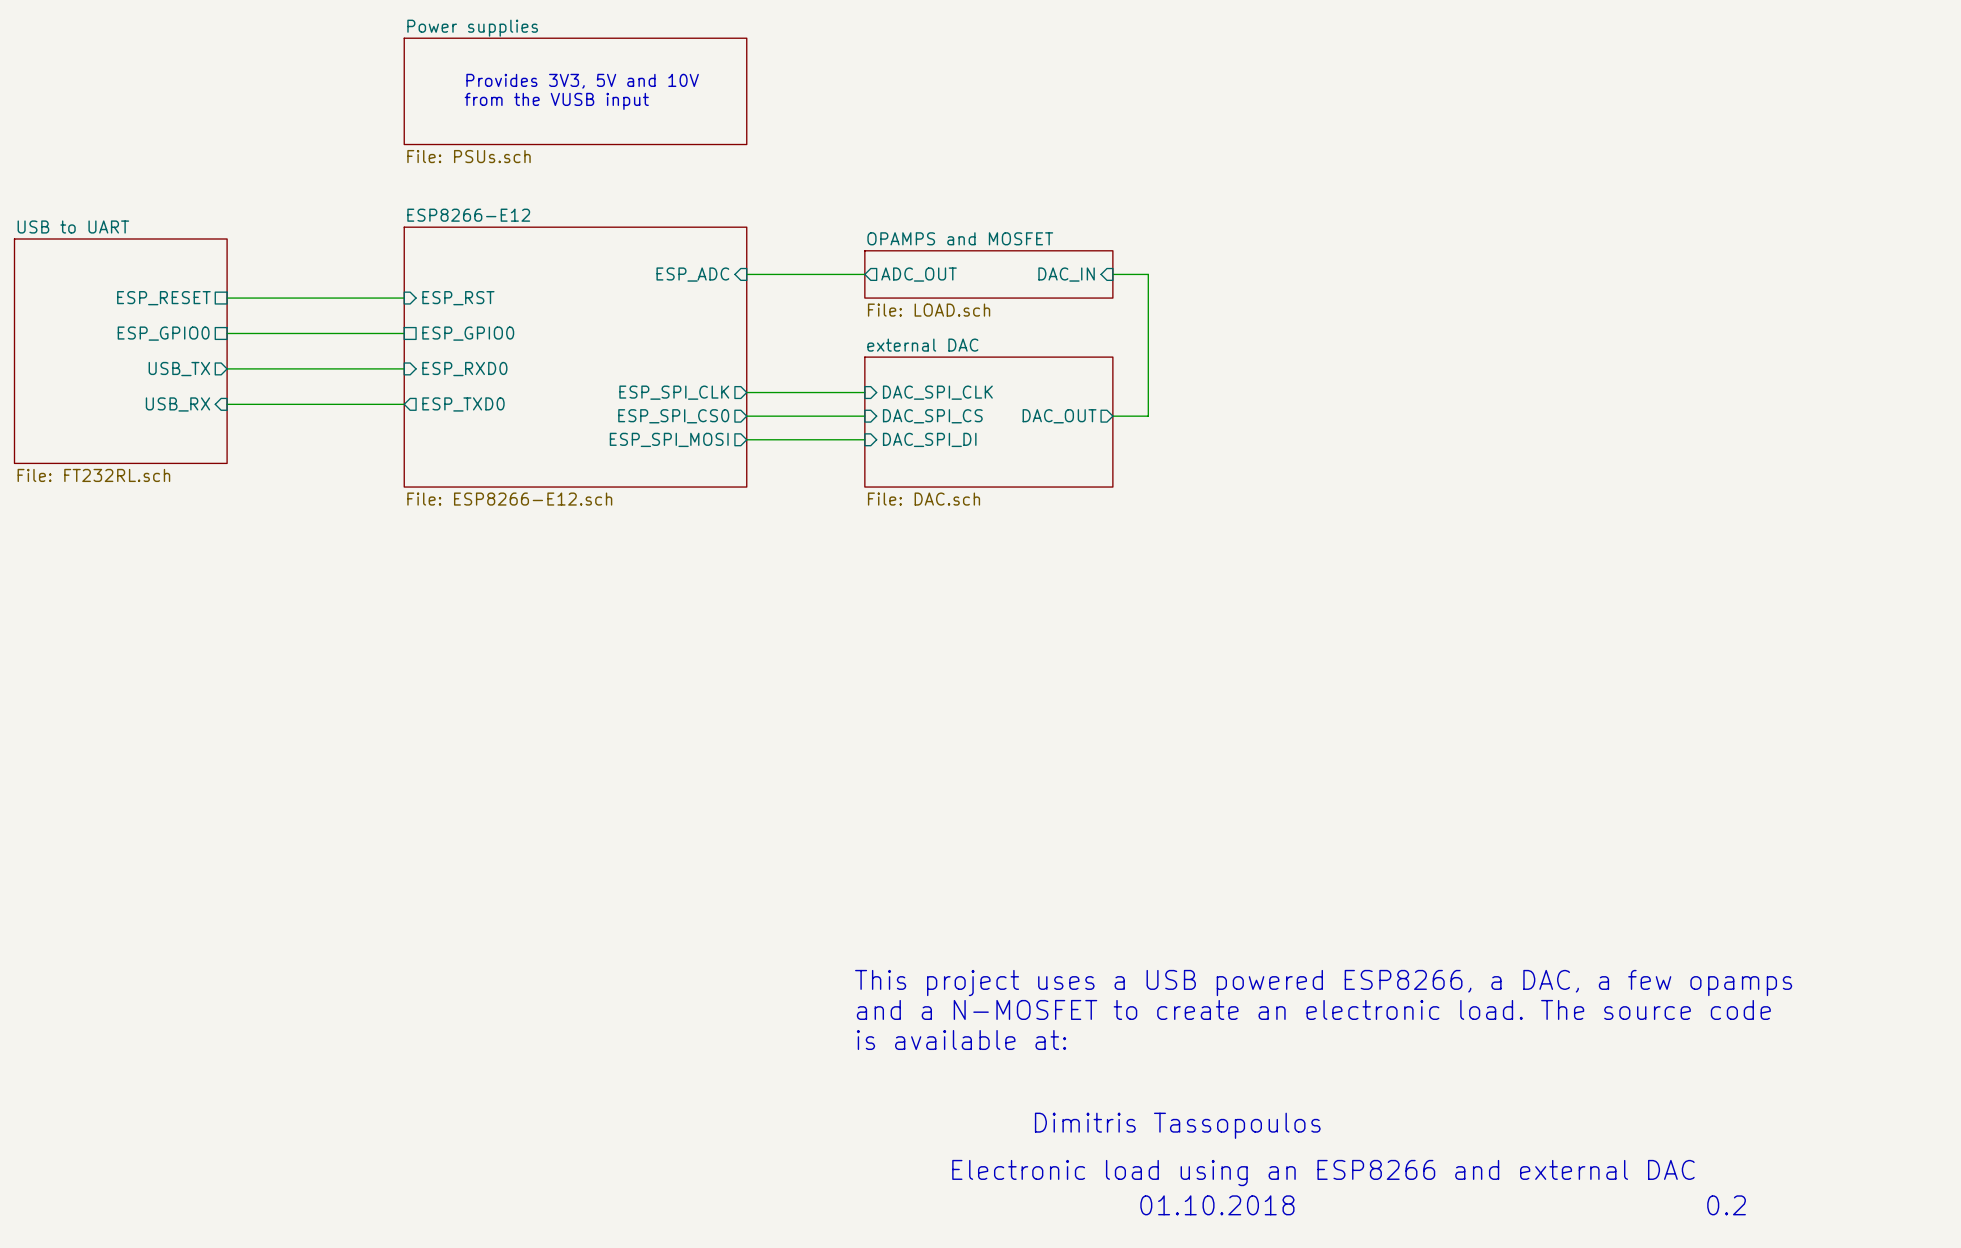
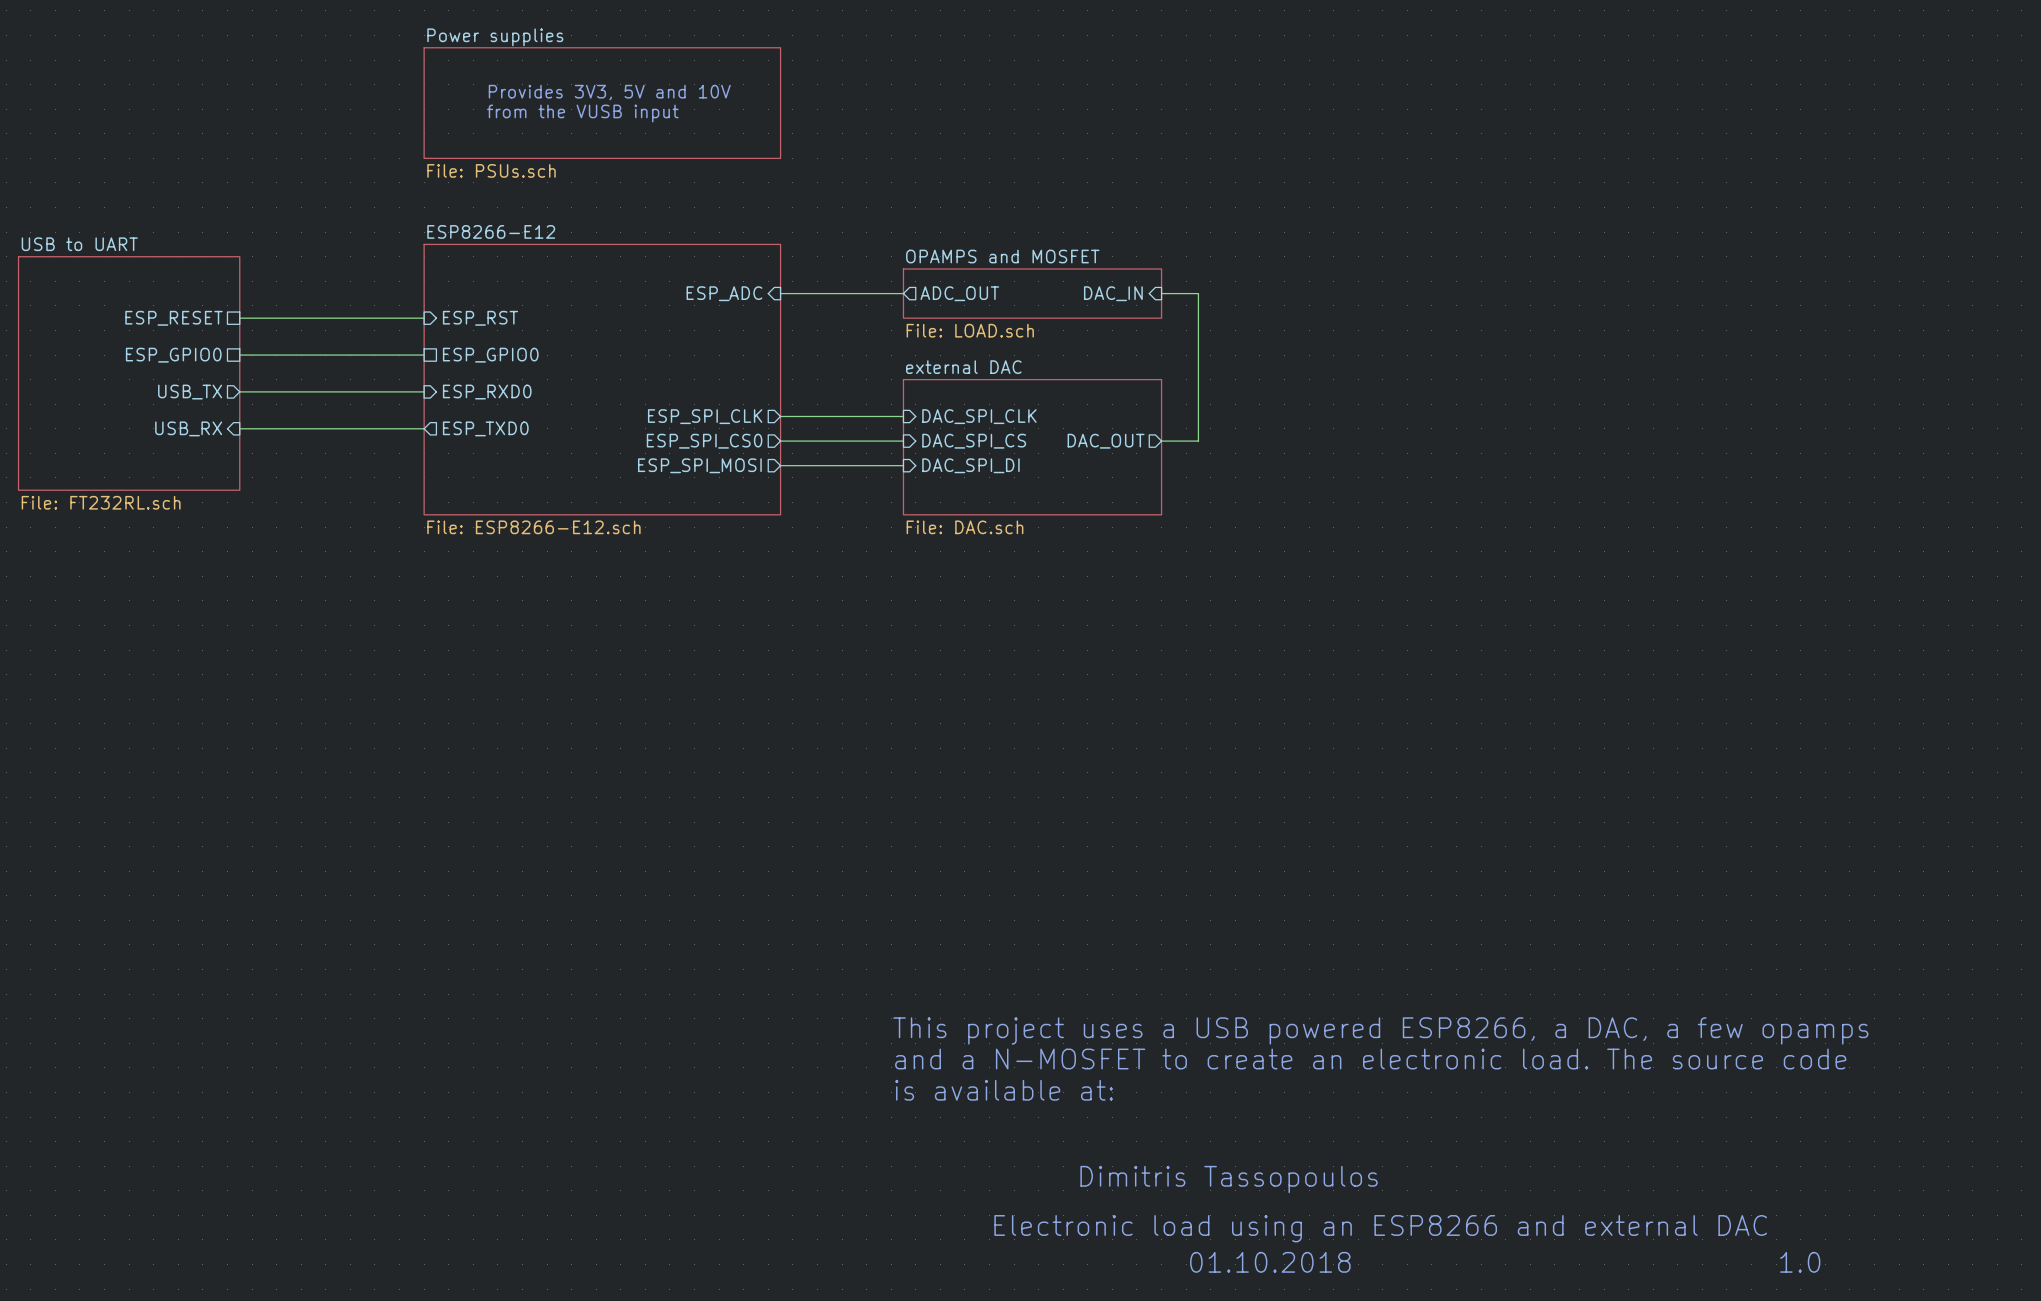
text: 0.2 (1726, 1205) -> 1.0 (1800, 1262)

